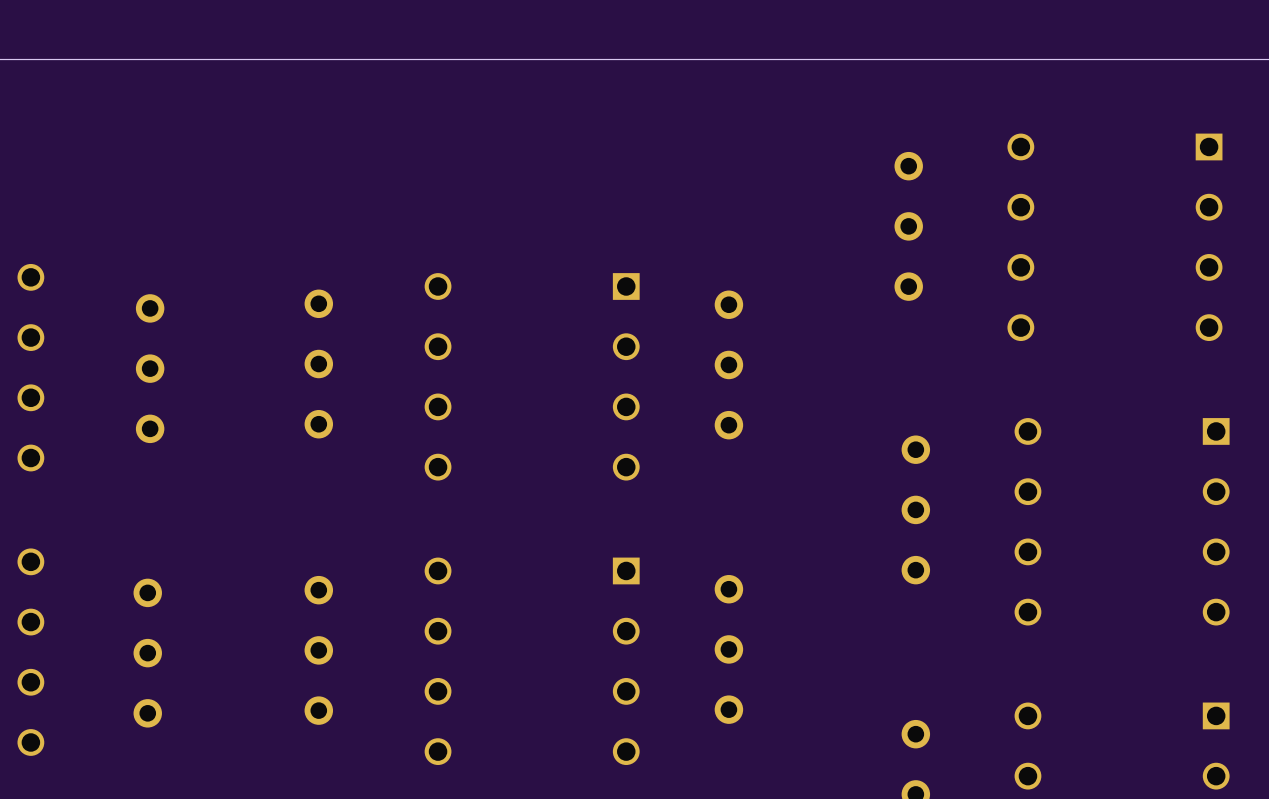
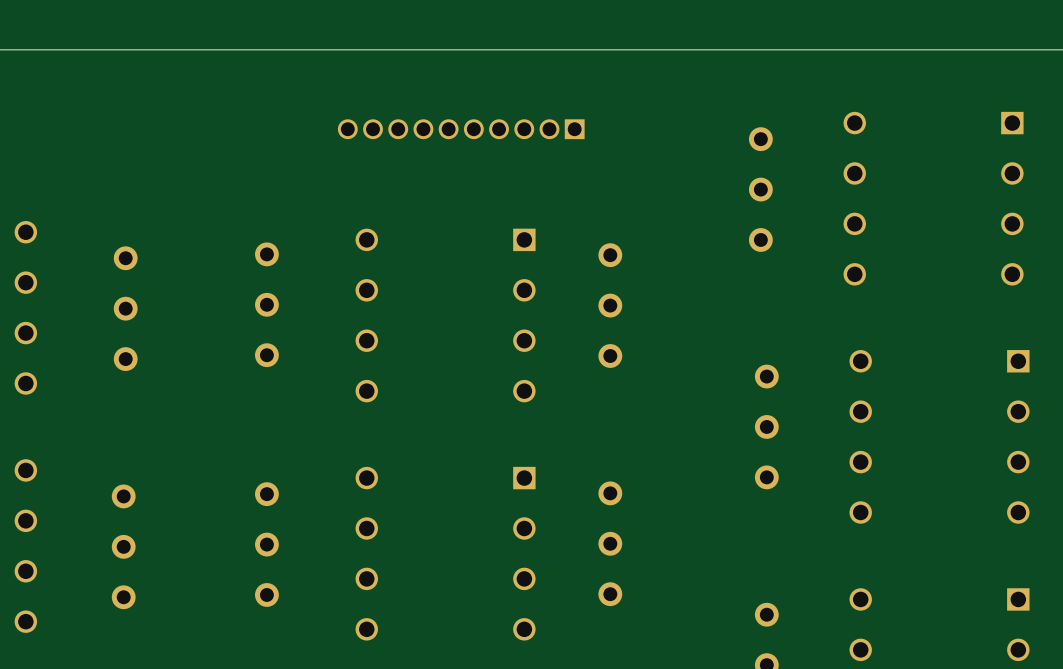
part: none -> (461, 129)

